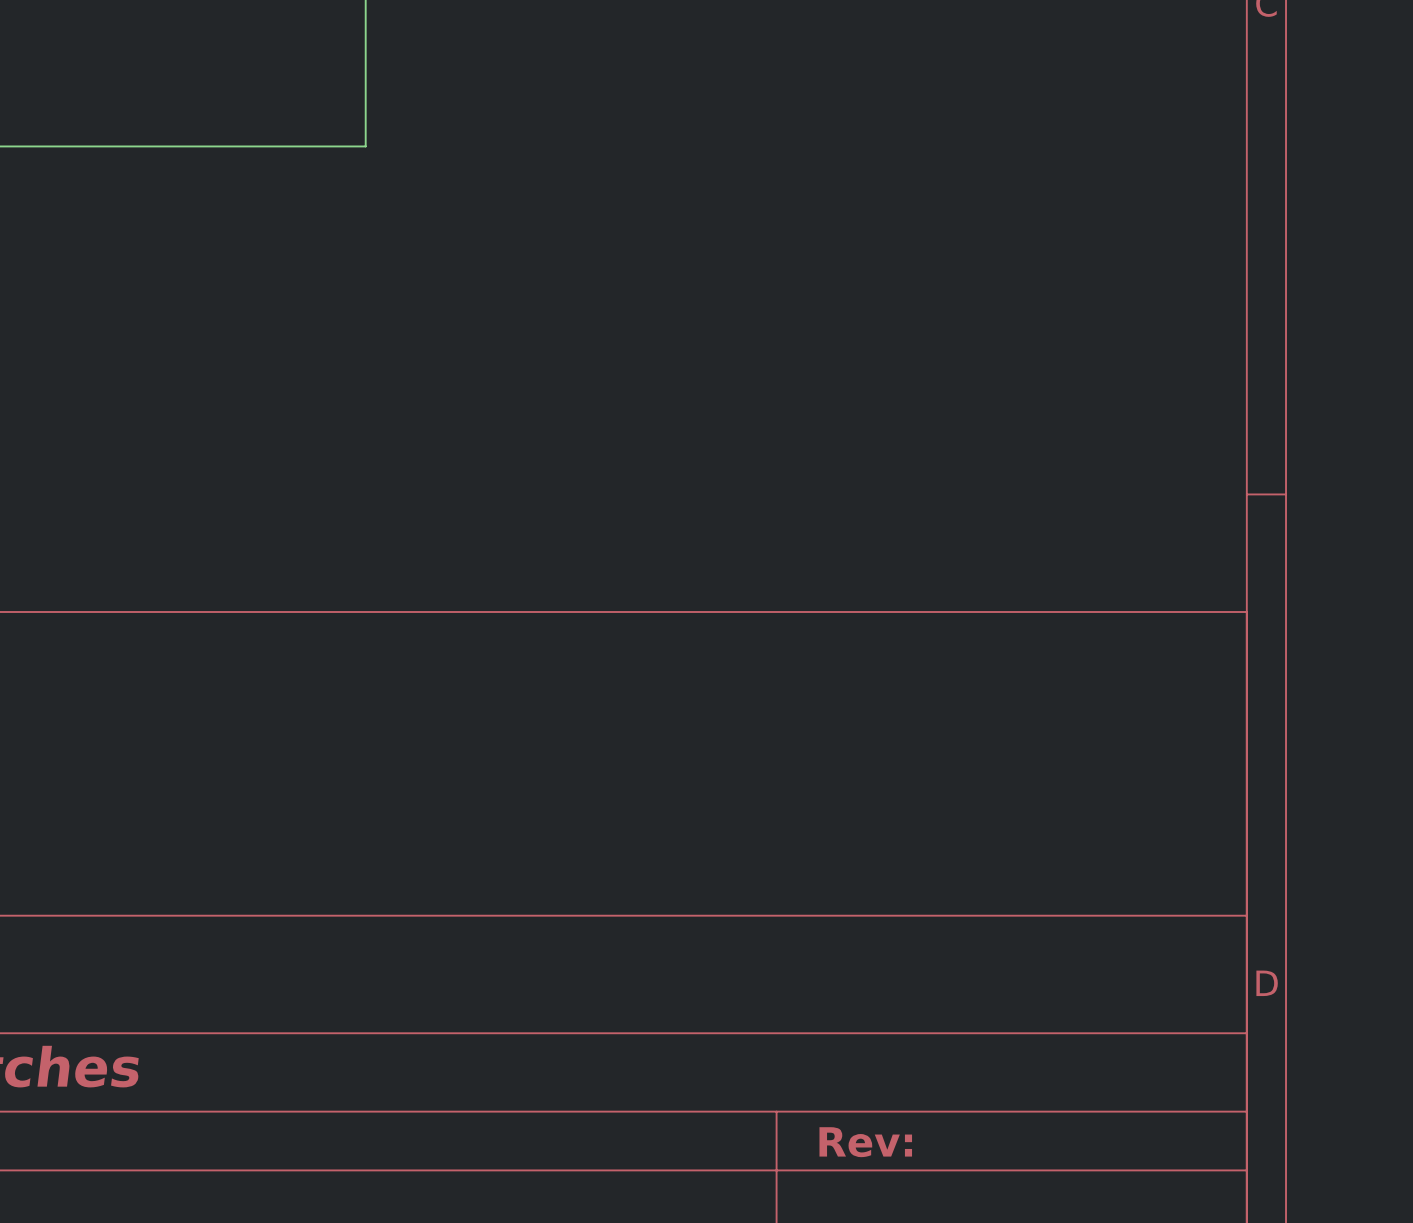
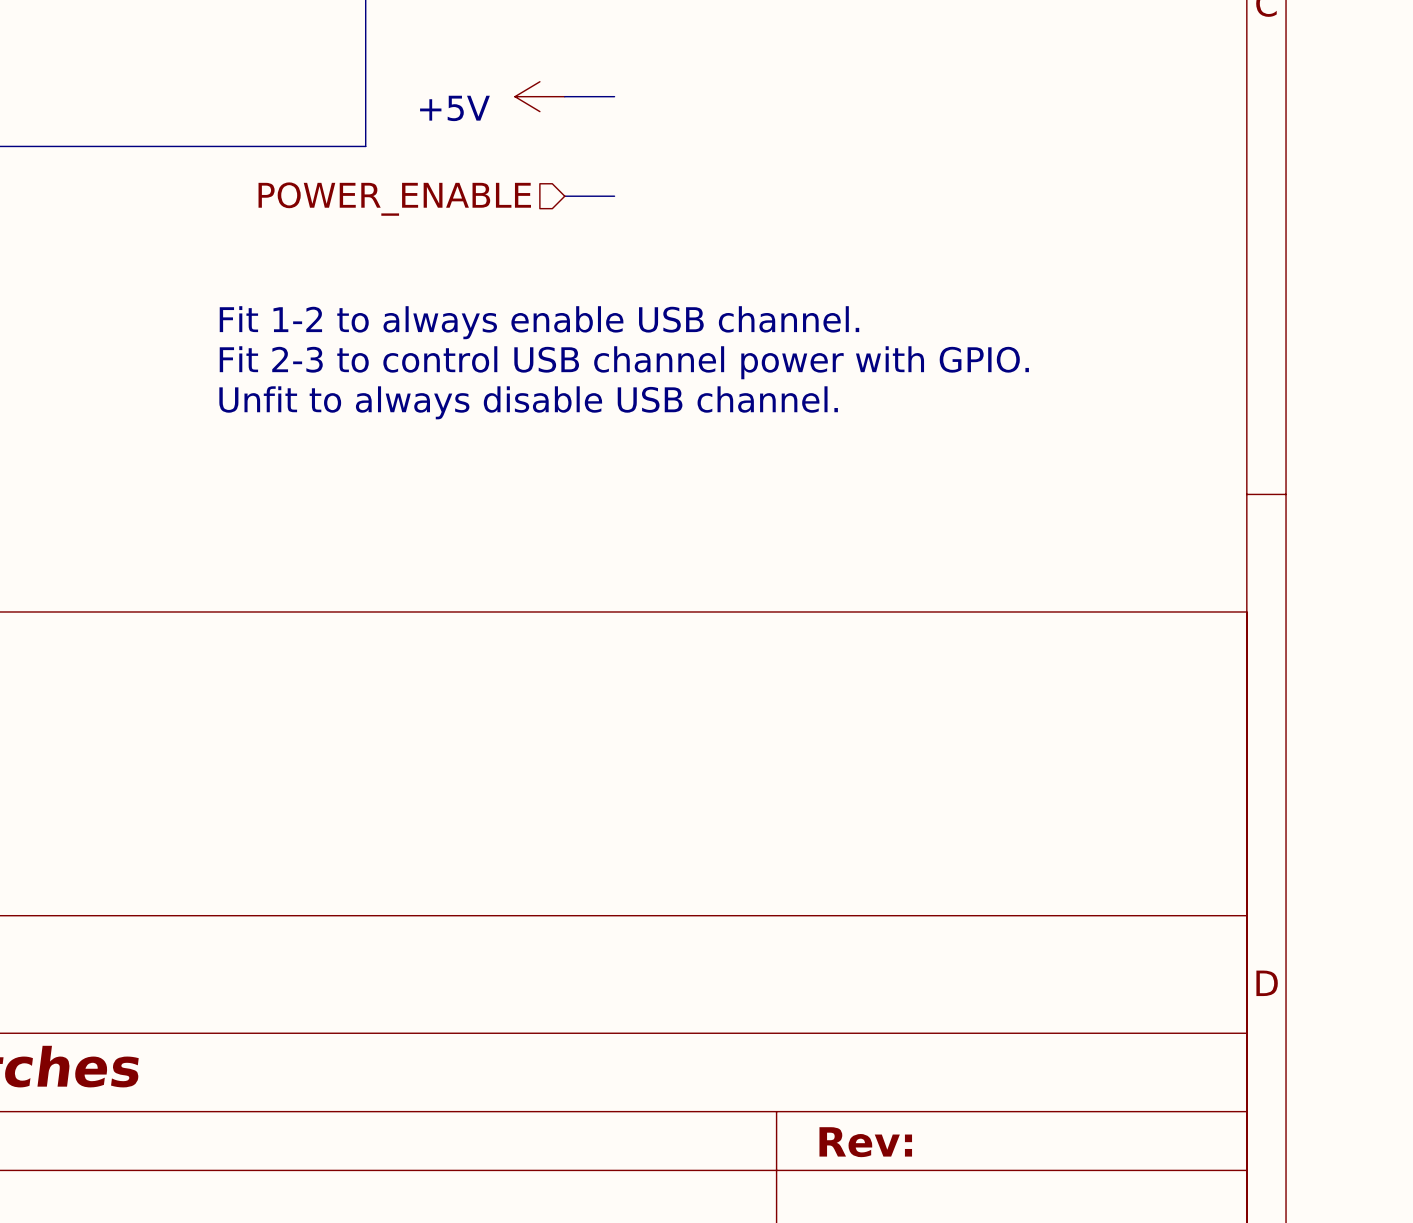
power symbol: none -> +5V (539, 96)
wire: none -> (564, 96) (614, 96)
wire: none -> (564, 196) (614, 196)
hierarchical label: none -> POWER_ENABLE (394, 199)
text: none -> Fit 1-2 to always enable USB channel. (539, 322)
text: none -> Fit 2-3 to control USB channel power with GPIO. (624, 362)
text: none -> Unfit to always disable USB channel. (528, 402)

